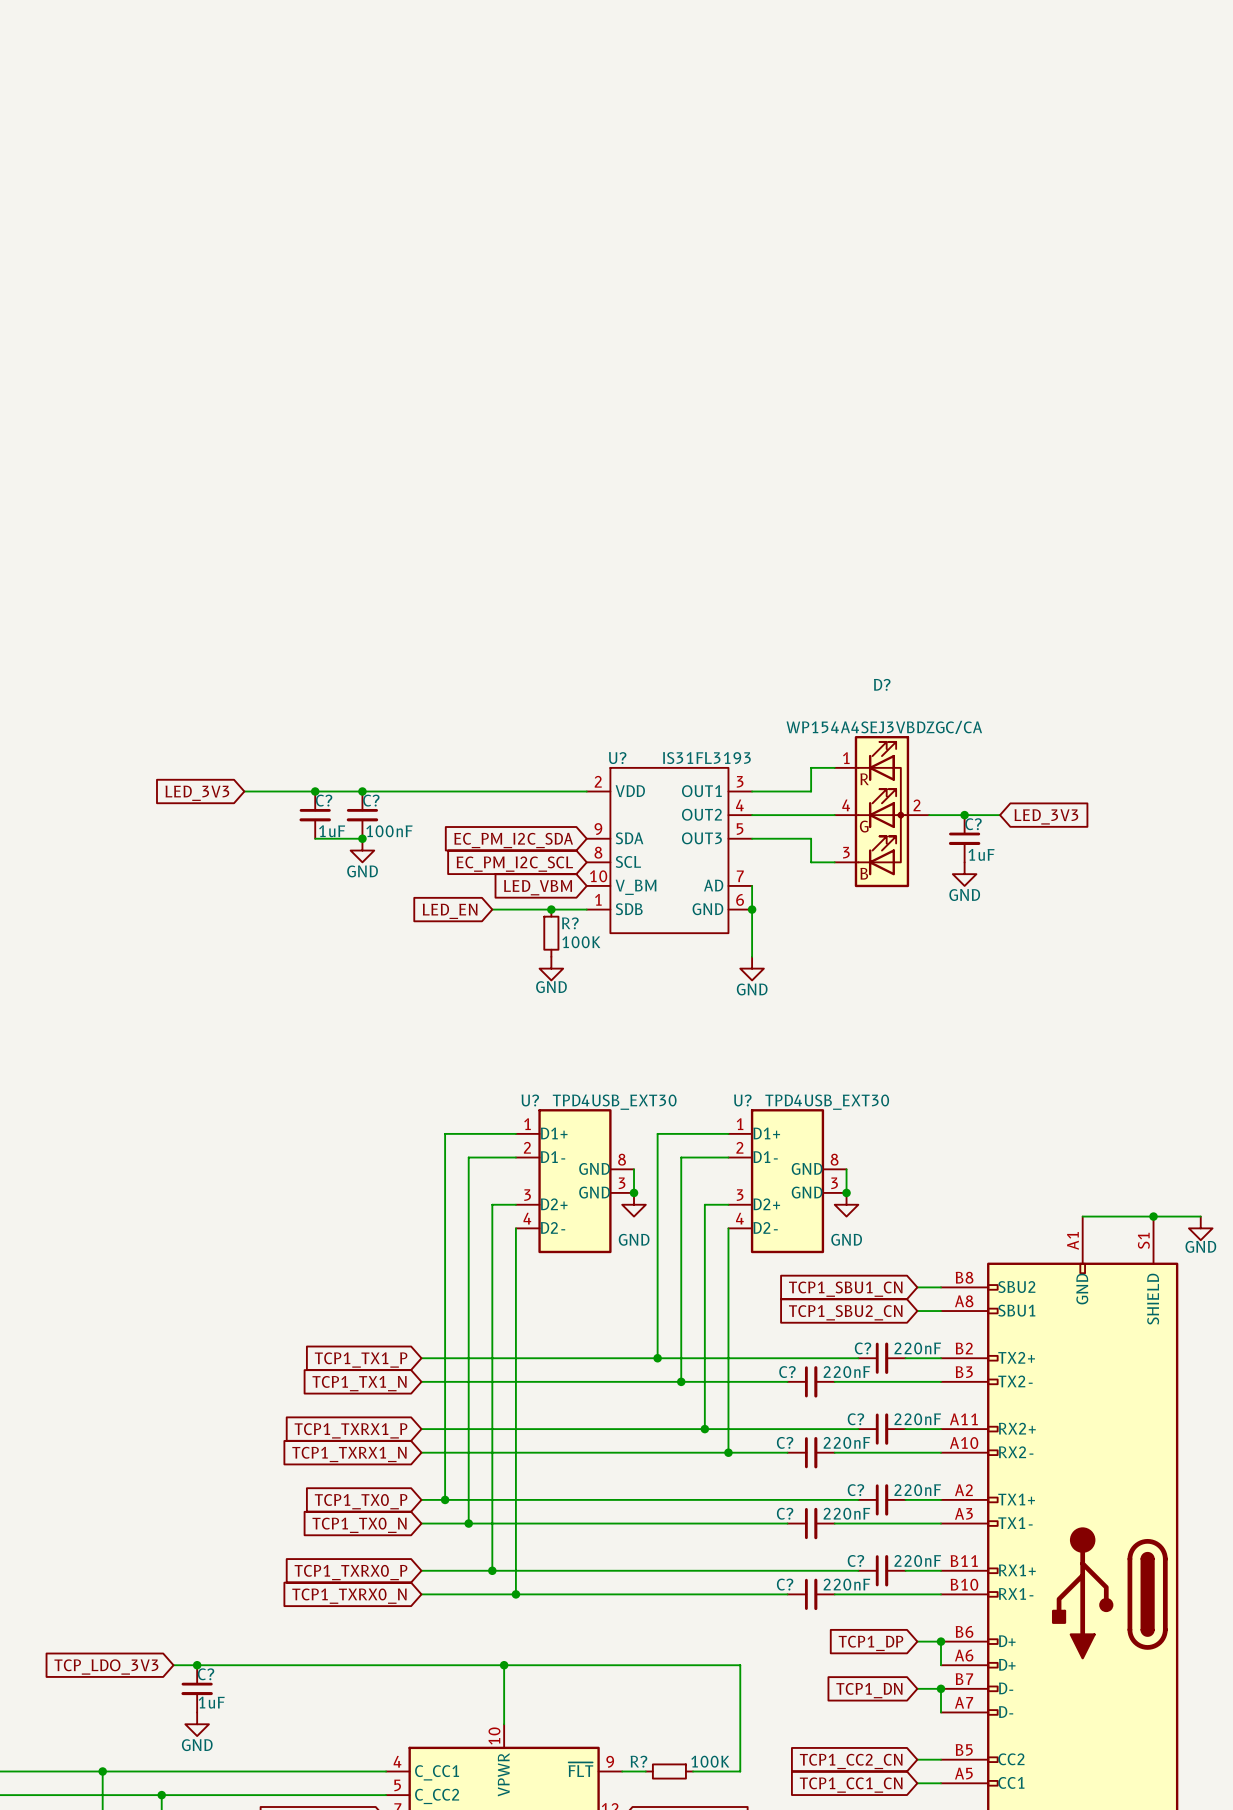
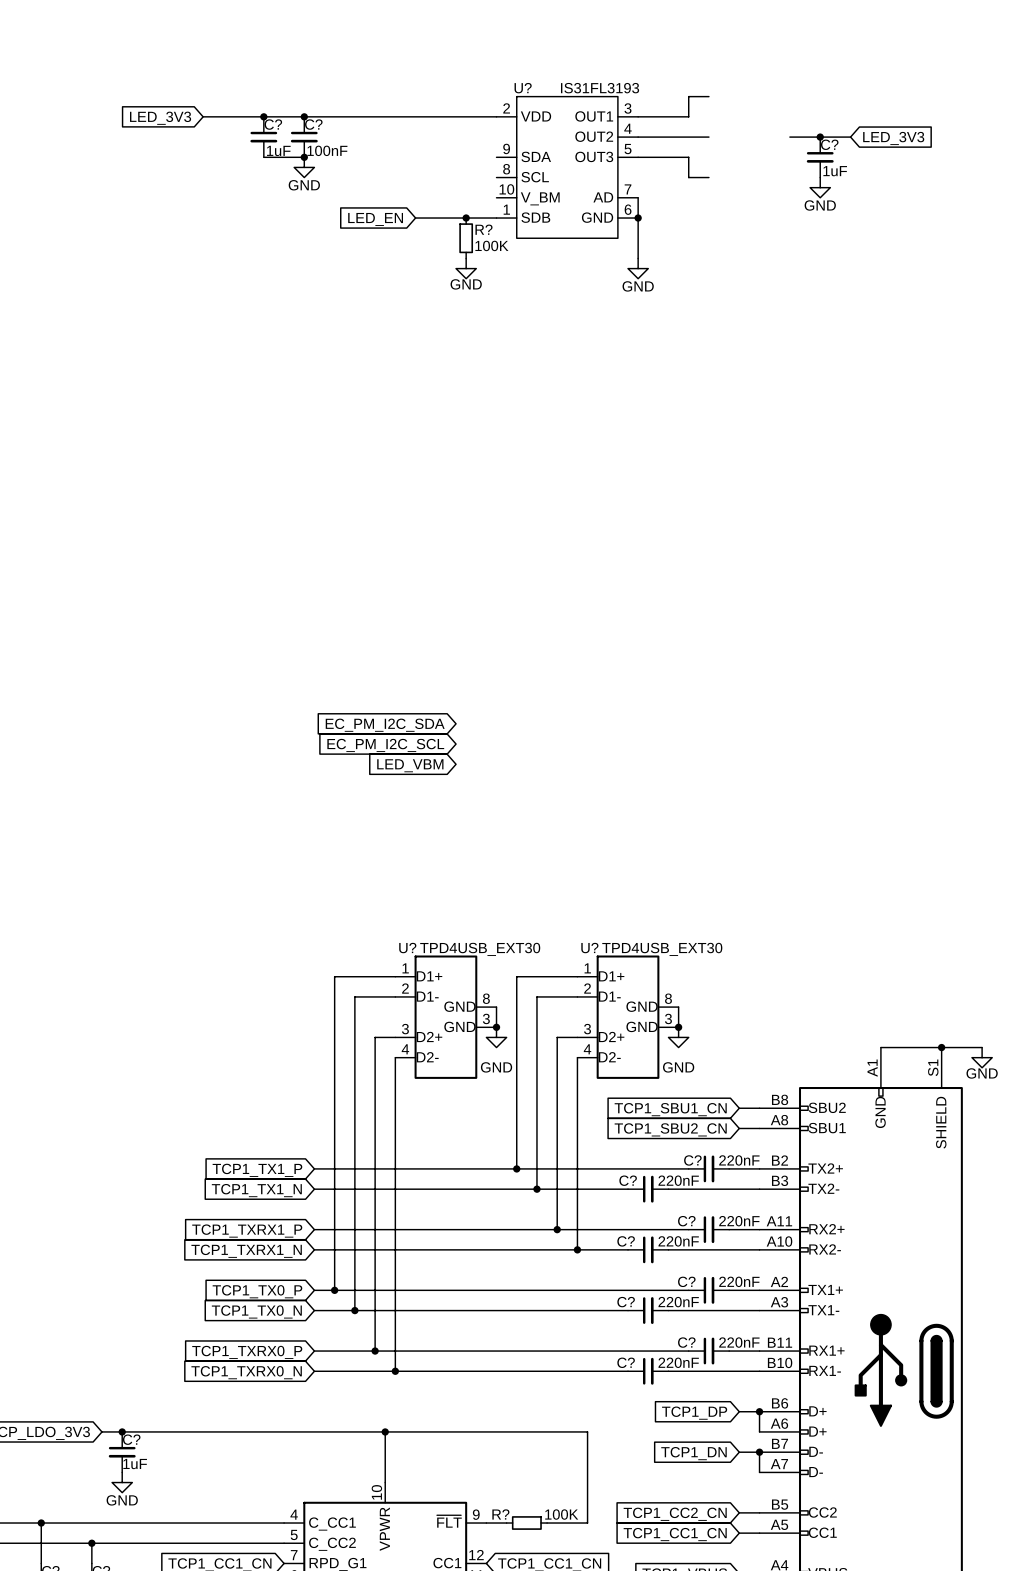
wire: none -> (708, 96) (688, 96) (688, 116) (638, 116)
wire: none -> (203, 116) (496, 116)
junction: none -> (263, 116)
junction: none -> (304, 116)
global label: none -> LED_3V3 (160, 118)
C?: none -> 1uF (263, 137)
C?: none -> 100nF (304, 137)
wire: none -> (638, 137) (708, 137)
wire: none -> (789, 137) (850, 137)
junction: none -> (820, 137)
global label: none -> LED_3V3 (893, 138)
wire: none -> (263, 157) (304, 157)
junction: none -> (304, 157)
wire: none -> (638, 157) (688, 157) (688, 177) (708, 177)
C?: none -> 1uF (820, 157)
power symbol: none -> GND (304, 167)
U?: none -> IS31FL3193 (567, 167)
power symbol: none -> GND (820, 187)
wire: none -> (638, 197) (638, 258)
wire: none -> (415, 218) (496, 218)
junction: none -> (466, 218)
junction: none -> (638, 218)
global label: none -> LED_EN (375, 219)
R?: none -> 100K (466, 238)
power symbol: none -> GND (466, 268)
power symbol: none -> GND (638, 268)
wire: (834, 767) (811, 767) (811, 791) (752, 791) -> none
wire: (244, 791) (586, 791) -> none
junction: (315, 791) -> none
junction: (362, 791) -> none
global label: LED_3V3 (197, 793) -> none
D?: WP154A4SEJ3VBDZGC/CA (881, 811) -> none
C?: 1uF (315, 815) -> none
C?: 100nF (362, 815) -> none
wire: (752, 815) (834, 815) -> none
wire: (929, 815) (1000, 815) -> none
junction: (964, 815) -> none
global label: LED_3V3 (1046, 816) -> none
wire: (315, 838) (362, 838) -> none
junction: (362, 838) -> none
wire: (752, 838) (811, 838) (811, 862) (834, 862) -> none
C?: 1uF (964, 838) -> none
power symbol: GND (362, 850) -> none
U?: IS31FL3193 (669, 850) -> none
power symbol: GND (964, 874) -> none
wire: (752, 885) (752, 956) -> none
wire: (492, 909) (586, 909) -> none
junction: (551, 909) -> none
junction: (752, 909) -> none
global label: LED_EN (450, 911) -> none
R?: 100K (551, 933) -> none
power symbol: GND (551, 968) -> none
power symbol: GND (752, 968) -> none

